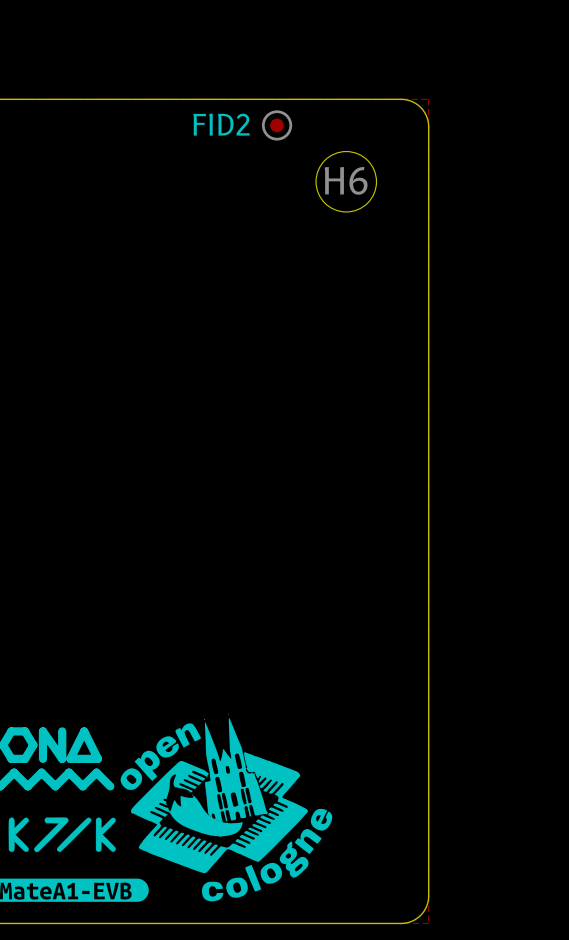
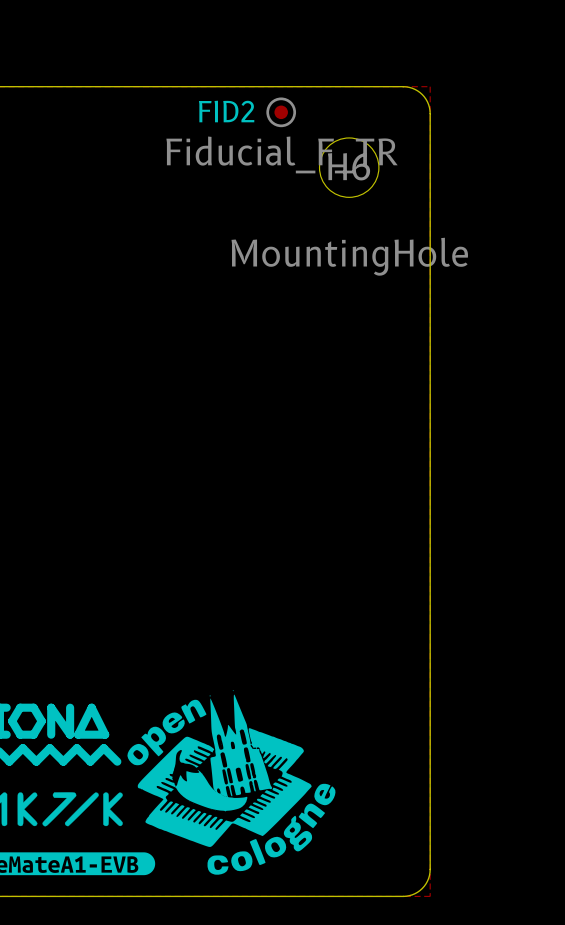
FID2 value: none -> Fiducial_F_TR (282, 154)
H6 value: none -> MountingHole (349, 256)

